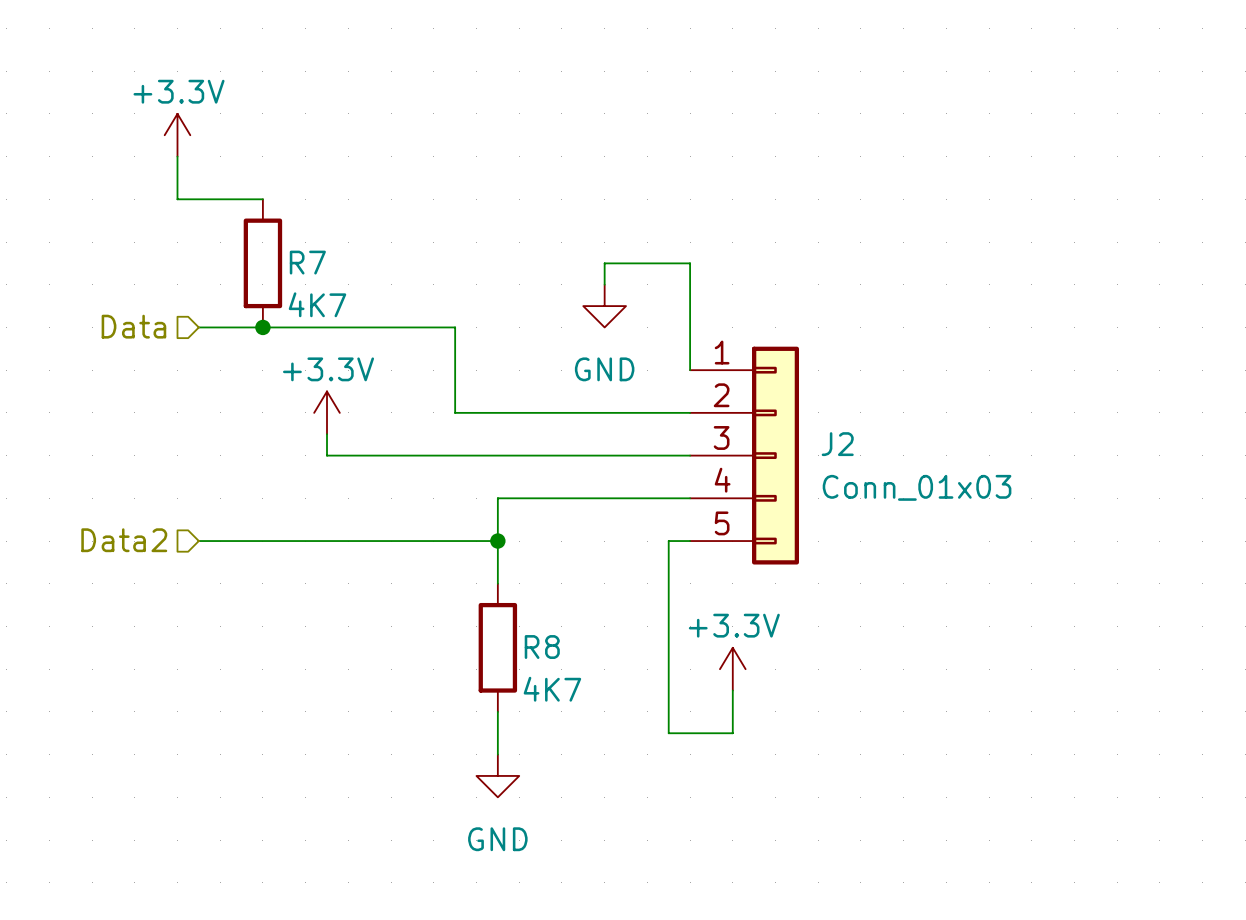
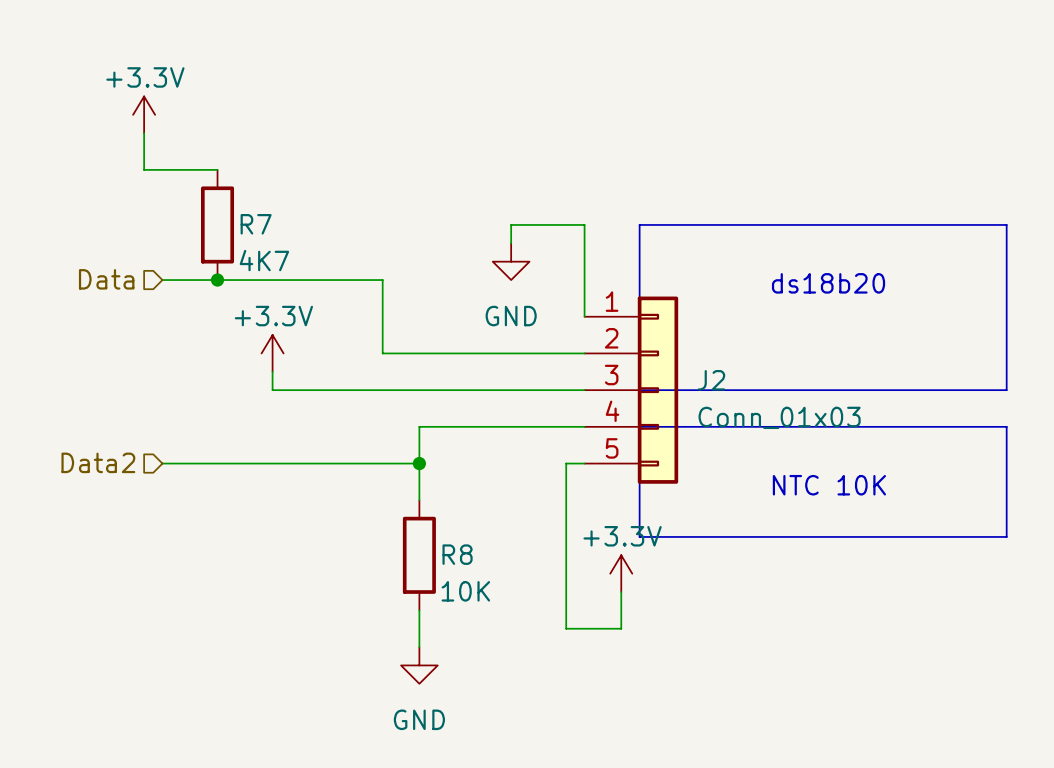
line: none -> (639, 224) (639, 390) (1006, 390) (1006, 224) (639, 224)
text: none -> ds18b20 (828, 283)
line: none -> (639, 426) (1006, 426) (1006, 536) (639, 536) (639, 426)
text: none -> NTC 10K (829, 485)
R8 value: 4K7 (552, 689) -> 10K (465, 591)

